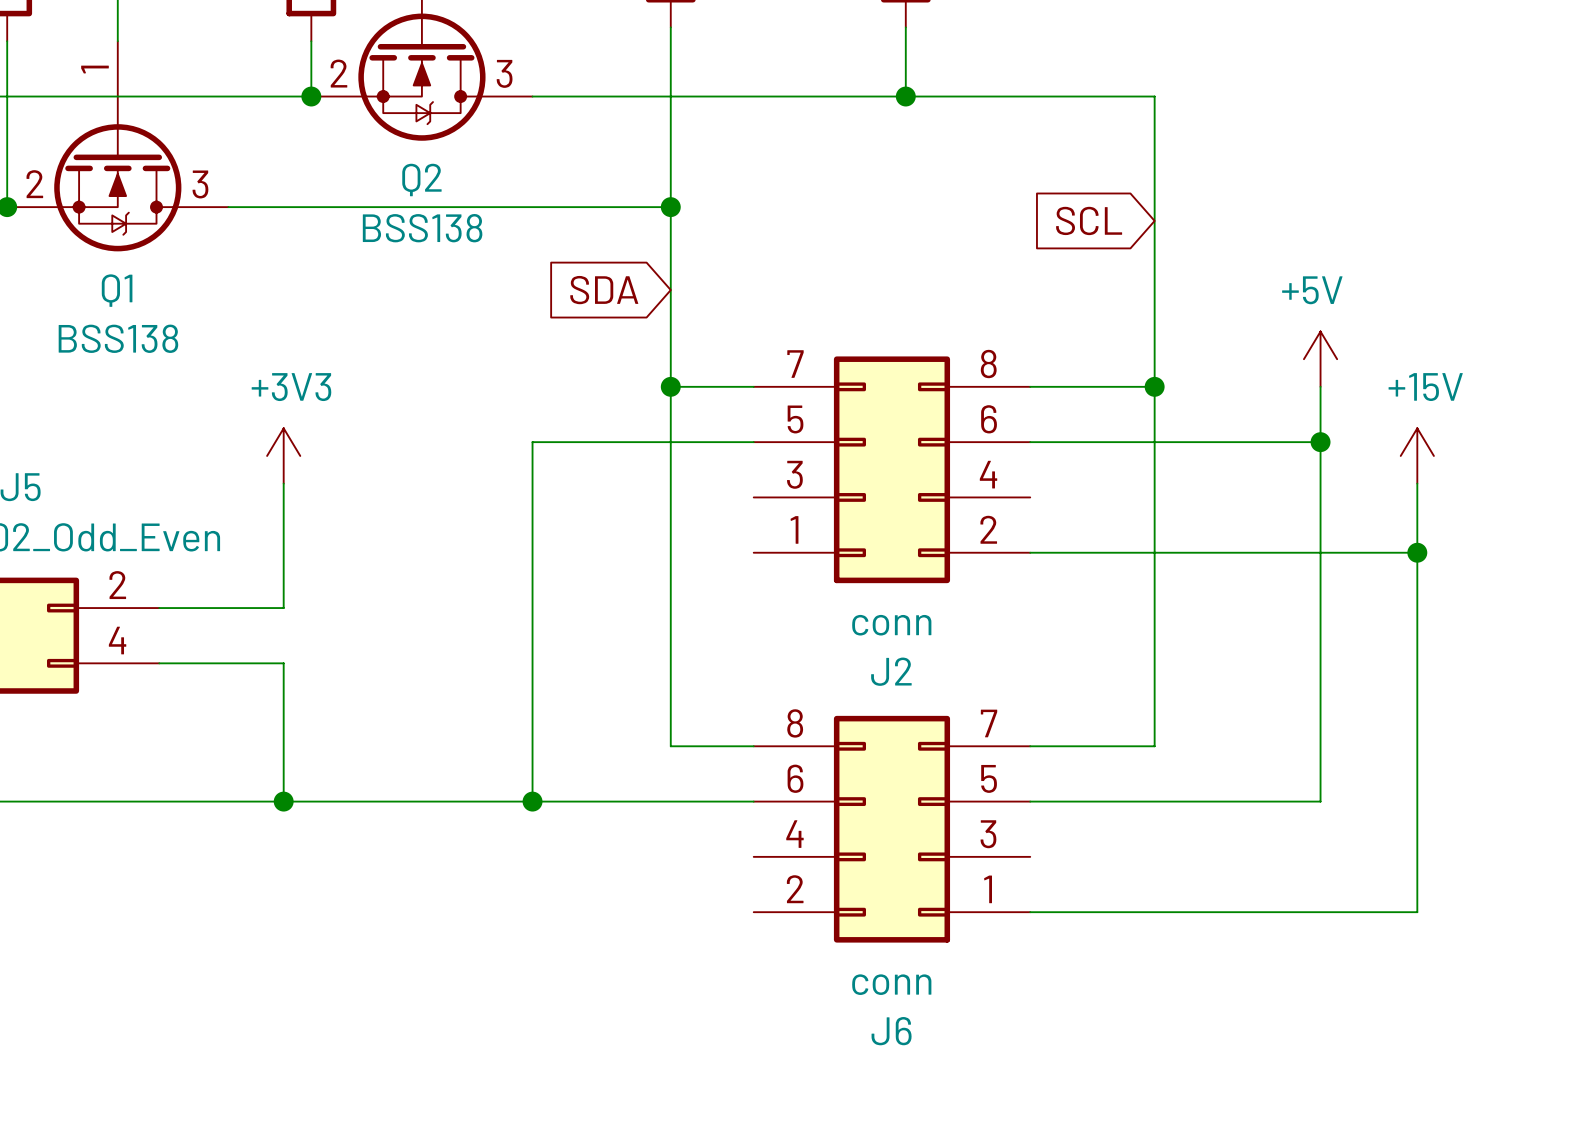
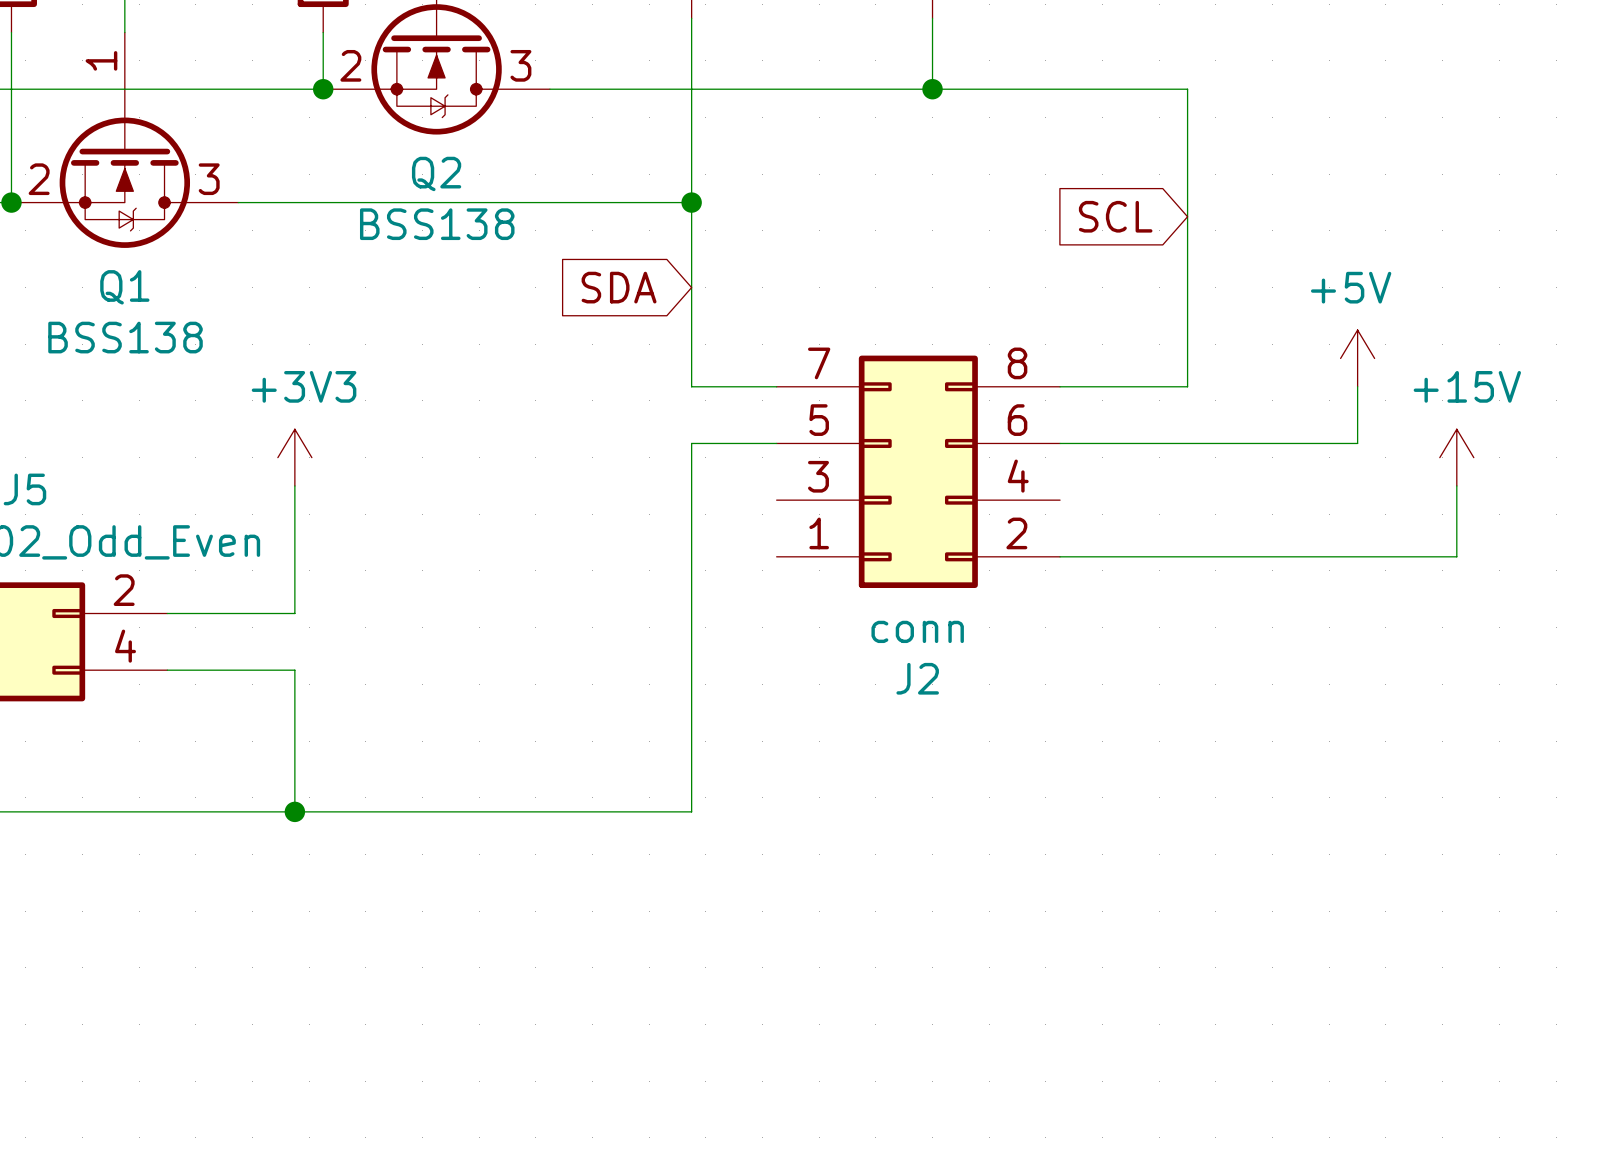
wire: (670, 386) (670, 442) (532, 442) (532, 801) -> none
junction: (670, 386) -> none
wire: (1154, 386) (1154, 746) (1030, 746) -> none
junction: (1154, 386) -> none
wire: (1320, 442) (1320, 801) (1030, 801) -> none
junction: (1320, 442) -> none
wire: (1417, 552) (1417, 912) (1030, 912) -> none
junction: (1417, 552) -> none
wire: (670, 746) (753, 746) -> (691, 755) (691, 811)
junction: (532, 801) -> none
wire: (670, 801) (753, 801) -> none
J6: conn (891, 829) -> none

